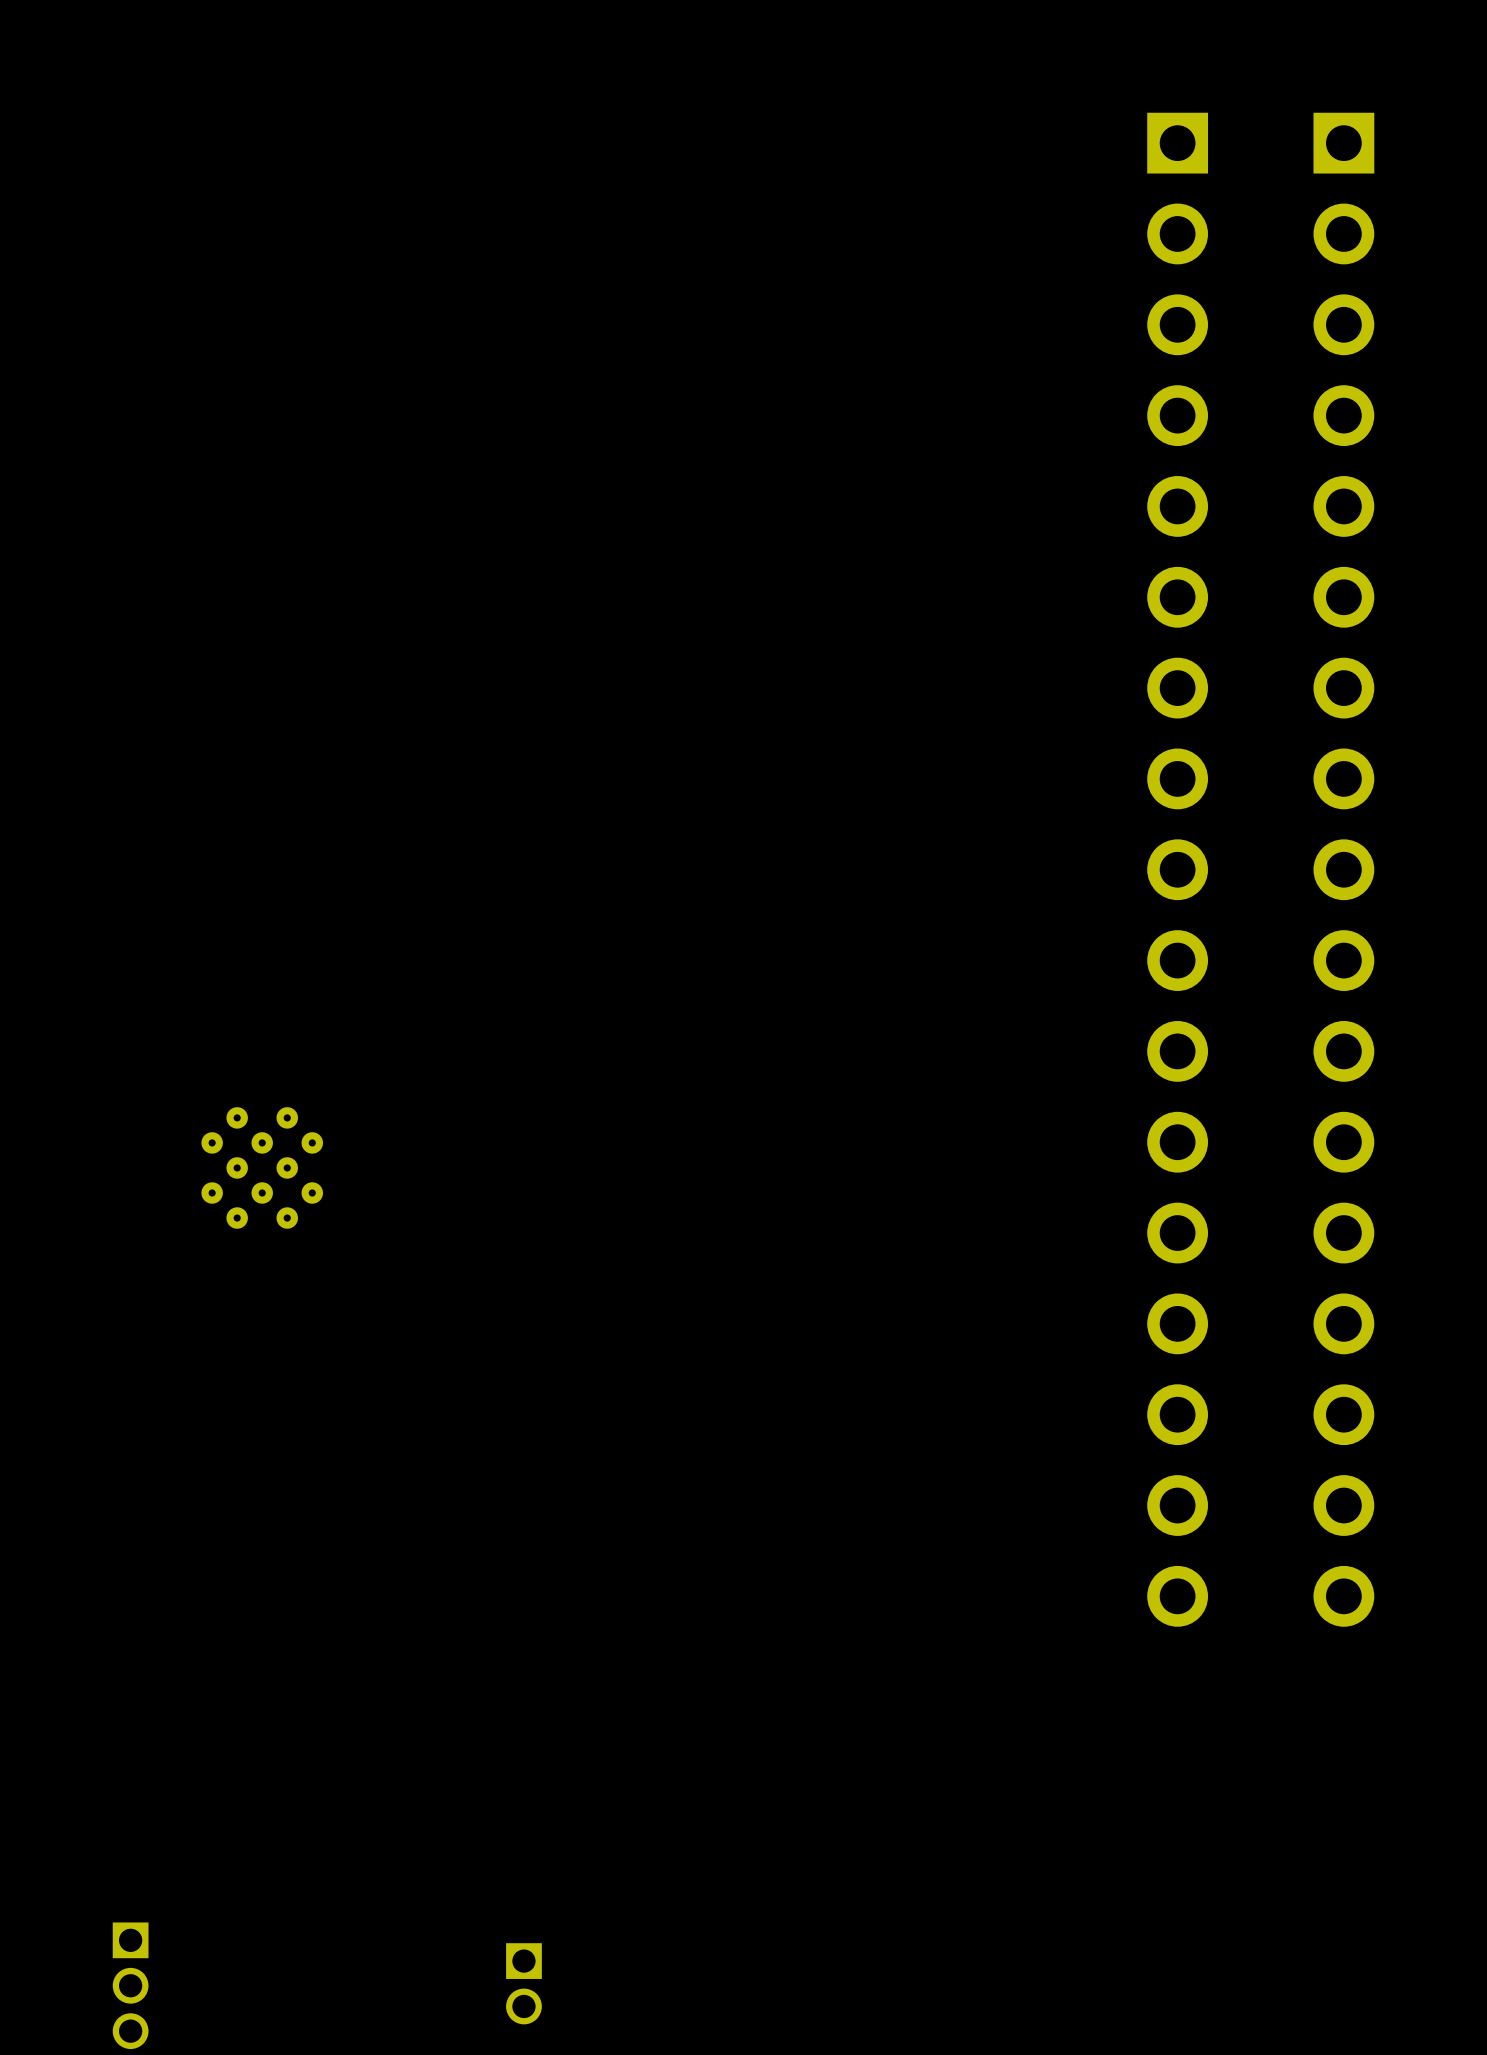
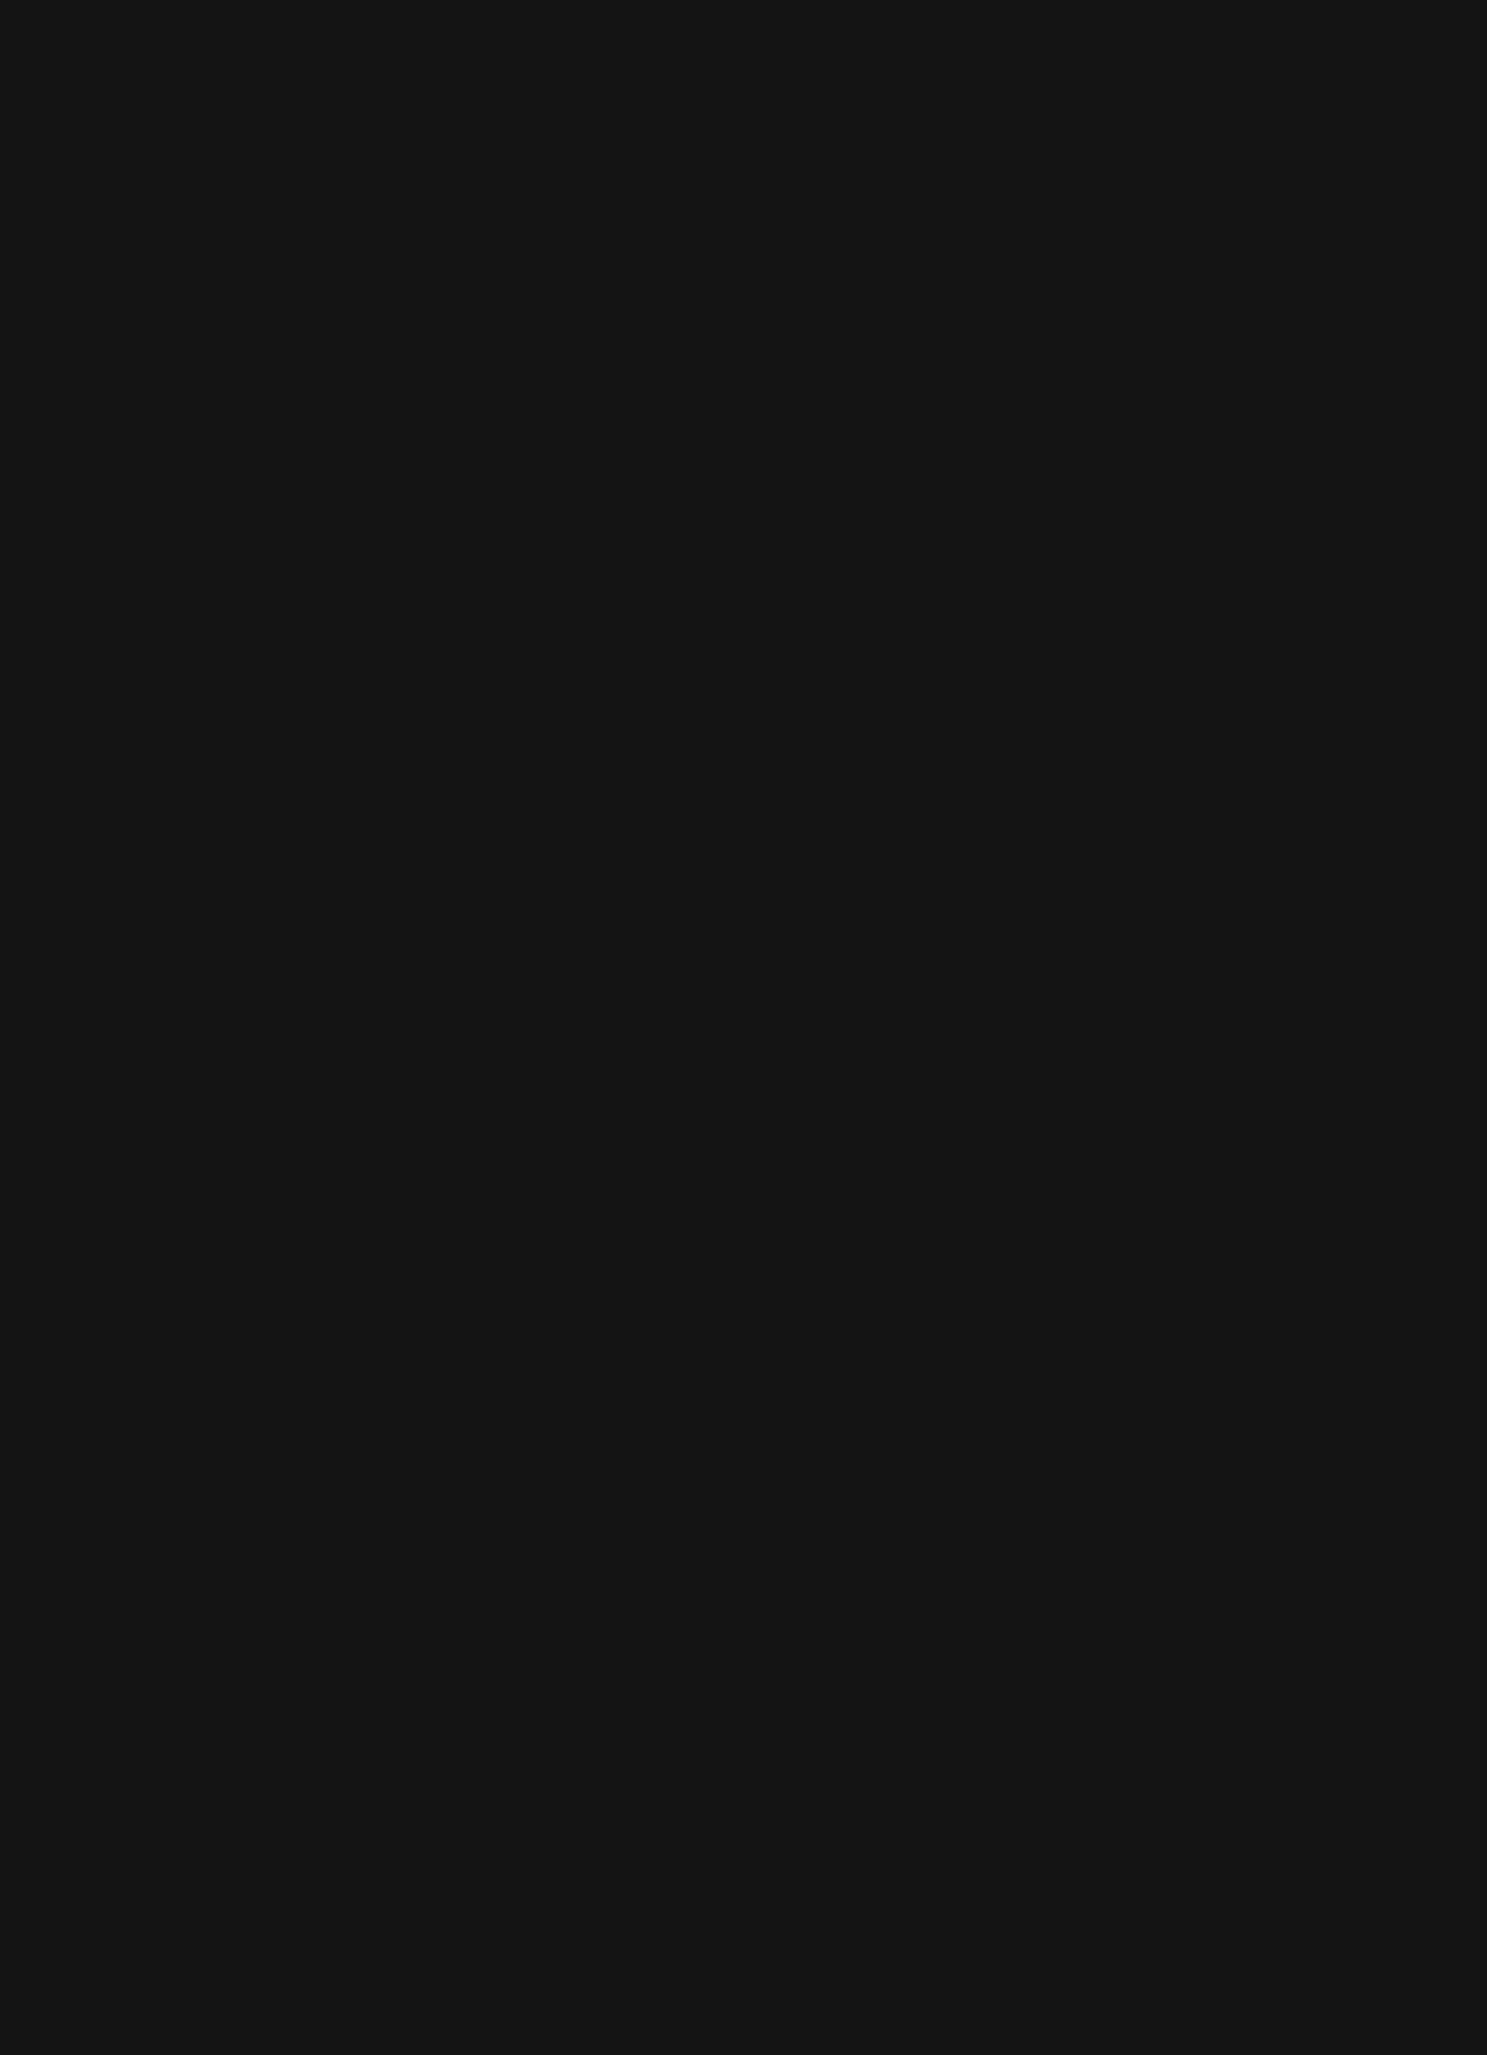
part: (1177, 869) -> none
part: (1343, 869) -> none
part: (262, 1167) -> none
part: (523, 1983) -> none
part: (130, 1985) -> none

